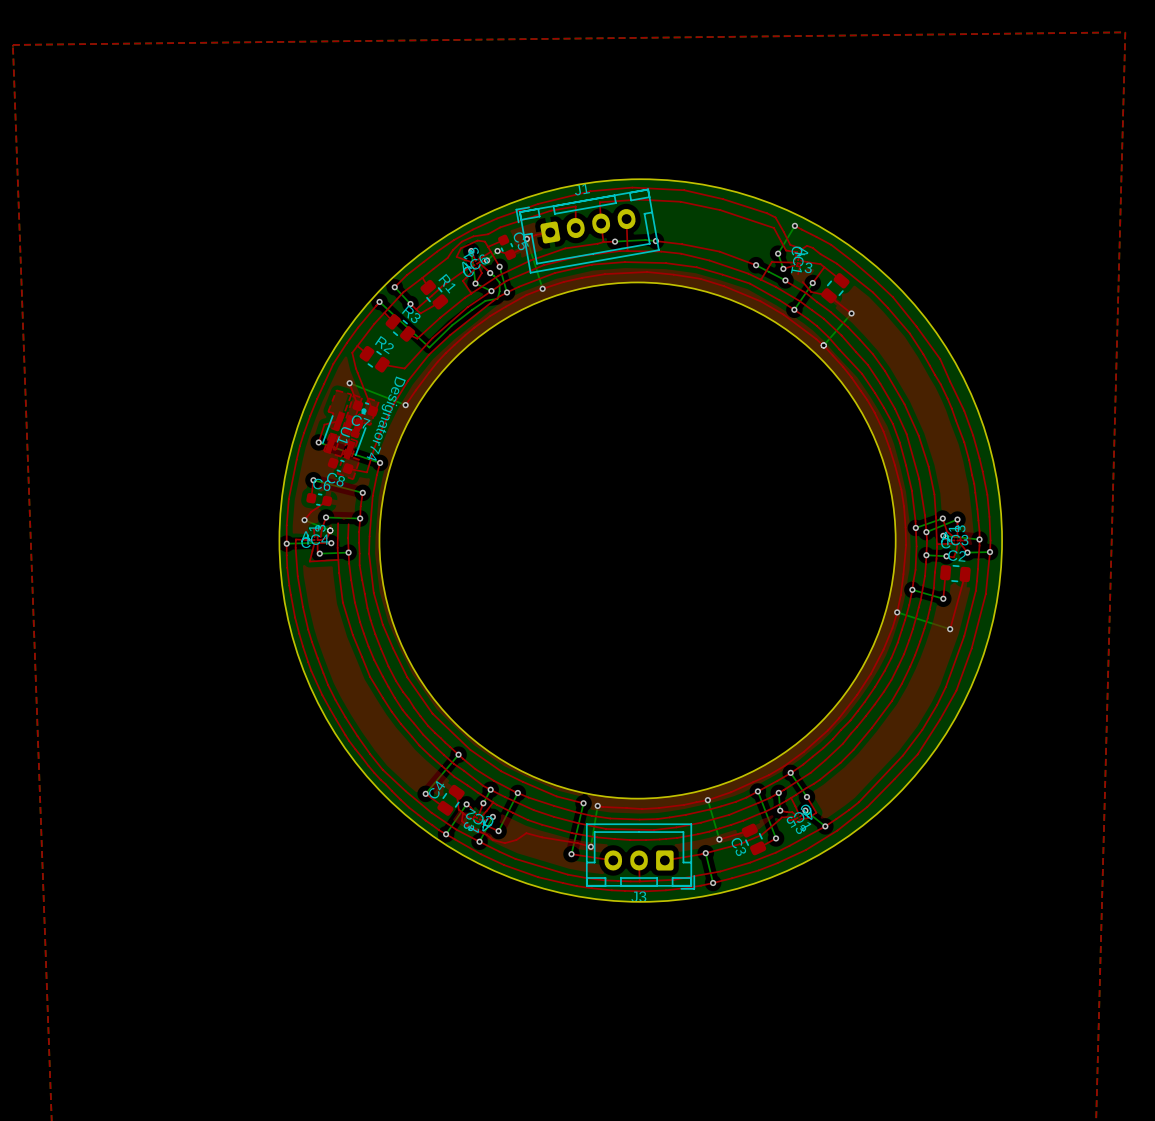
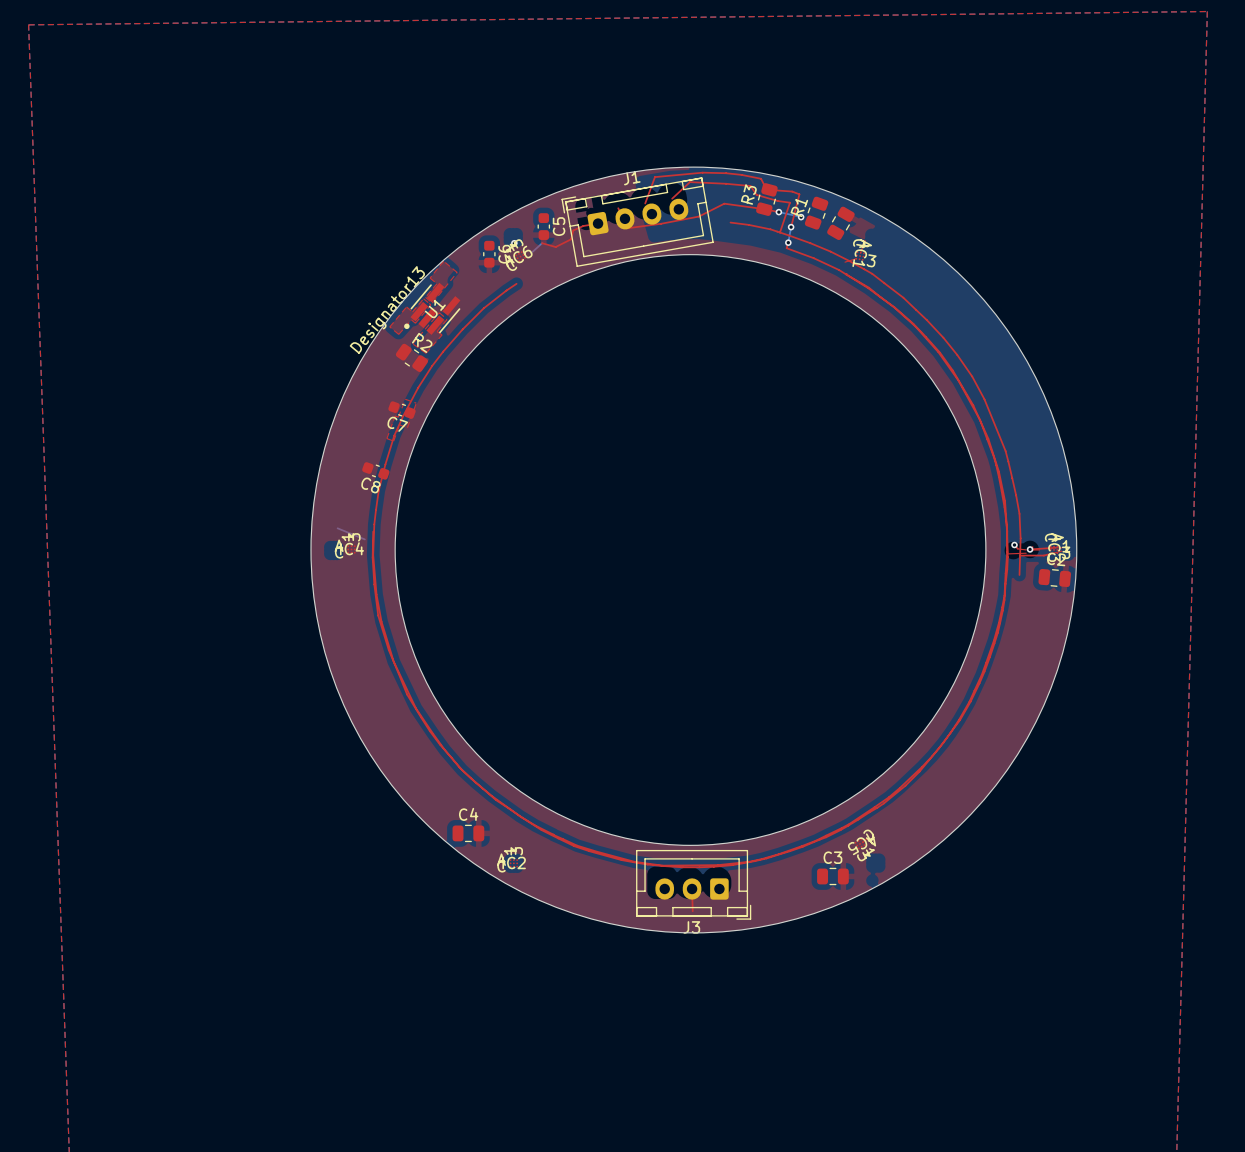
top track: none -> (769, 189) (792, 191) (799, 194) (791, 227)
top track: none -> (767, 192) (761, 178) (726, 173) (702, 172) (654, 177) (645, 203)
top track: none -> (672, 198) (689, 182) (750, 186) (756, 194) (789, 202) (779, 232)
top track: none -> (618, 208) (627, 228) (698, 216) (724, 203) (778, 212)
top track: (626, 219) (627, 251) -> none
bottom track: none -> (778, 212) (801, 217)
via: none -> (778, 212)
top track: (794, 225) (831, 244) (875, 280) (892, 297) (940, 359) (964, 411) (973, 435) (987, 494) (990, 540) (985, 594) (971, 648) (956, 690) (917, 754) (894, 779) (867, 806) (837, 830) (805, 849) (758, 870) (701, 885) (644, 891) (576, 886) (538, 877) (480, 854) (425, 820) (408, 807) (380, 779) (349, 740) (322, 695) (302, 646) (290, 595) (286, 555) (288, 499) (299, 446) (317, 398) (333, 363) (358, 327) (379, 301) -> none
bottom track: (794, 225) (778, 253) (783, 268) -> none
via: (794, 225) -> none
via: none -> (801, 217)
top track: (575, 228) (575, 206) (551, 210) (500, 227) (488, 234) (473, 236) (461, 241) (447, 257) (422, 277) -> none
top track: none -> (730, 222) (770, 229) (810, 243) (849, 261) (872, 273) (903, 297) (943, 337) (972, 376) (984, 399) (1005, 451) (1019, 513) (1019, 575)
part: none -> (840, 223)
bottom track: none -> (791, 227) (788, 242)
via: none -> (791, 227)
bottom track: (526, 238) (542, 288) -> none
via: (526, 238) -> none
top track: (503, 240) (488, 246) -> none
top track: (615, 241) (603, 242) -> none
via: (615, 241) -> none
top track: (655, 241) (719, 251) (756, 265) -> none
bottom track: (655, 241) (615, 241) -> none
via: (655, 241) -> none
top track: (603, 242) (599, 202) (639, 199) (680, 201) (720, 210) (773, 227) (786, 250) (797, 252) (795, 259) -> none
top track: (603, 242) (565, 248) (530, 260) (498, 275) (465, 297) (417, 338) (407, 333) -> none
C5 rotation: 0° (506, 247) -> 25° clockwise (543, 226)
top track: none -> (788, 242) (786, 248) (838, 269) (868, 288) (915, 326) (938, 352) (958, 380) (980, 419) (993, 457) (1004, 507) (1007, 552) (1004, 595) (993, 640) (969, 701) (943, 742) (900, 787) (849, 823) (801, 846) (749, 861) (718, 865) (662, 865) (634, 861) (577, 845) (535, 825) (492, 796) (462, 770) (444, 750) (415, 708) (393, 661) (381, 621) (376, 594) (373, 555) (374, 524) (378, 490) (394, 435) (418, 387) (443, 351) (483, 308) (516, 283)
via: none -> (788, 242)
top track: (471, 251) (475, 261) -> none
bottom track: (471, 251) (475, 283) -> none
top track: (490, 251) (478, 259) -> none
via: (497, 251) -> none
top track: (627, 251) (579, 256) (543, 265) (506, 280) (467, 307) (432, 338) (404, 368) (382, 364) -> none
top track: (627, 251) (681, 253) (709, 260) (748, 273) (800, 301) (823, 318) (841, 335) (867, 364) (880, 383) (906, 434) (919, 479) (924, 515) (927, 540) (926, 563) -> none
via: (778, 253) -> none
top track: (487, 260) (477, 263) -> none
via: (487, 260) -> none
top track: (801, 260) (820, 264) (841, 280) -> none
top track: (472, 262) (456, 256) (460, 248) (477, 240) (484, 241) (499, 266) -> none
top track: (794, 262) (771, 262) (760, 279) -> none
top track: (800, 263) (797, 263) (797, 266) (800, 266) (798, 274) -> none
top track: (481, 264) (490, 273) -> none
top track: (474, 265) (442, 286) (416, 309) -> none
bottom track: (756, 265) (785, 280) -> none
via: (756, 265) -> none
top track: (478, 266) (481, 273) (475, 283) -> none
bottom track: (499, 266) (506, 292) -> none
via: (499, 266) -> none
top zone outline: none -> (443, 261) (457, 272) (432, 303) (425, 297) (436, 283) (430, 278) (443, 261)
top track: (476, 267) (462, 280) (471, 293) -> none
top track: (824, 267) (812, 283) -> none
via: (783, 268) -> none
bottom track: (490, 273) (499, 282) (497, 298) (485, 300) (472, 309) (451, 325) (429, 347) (379, 301) -> none
via: (490, 273) -> none
top track: (422, 277) (403, 292) (374, 323) (352, 352) (355, 368) (372, 411) -> none
top track: (422, 277) (428, 287) -> none
via: (785, 280) -> none
round board edge size: [378, 281, 897, 800] -> [394, 254, 987, 846]
top track: (802, 281) (811, 291) (828, 295) (851, 313) -> none
R1 name position: R1 (447, 283) -> R1 (799, 208)
bottom track: (475, 283) (491, 291) -> none
via: (475, 283) -> none
bottom track: (812, 283) (794, 309) -> none
via: (812, 283) -> none
top track: (394, 287) (437, 251) (472, 229) (538, 203) (590, 191) (632, 187) (684, 190) (723, 199) (775, 217) (790, 244) (802, 248) (806, 245) (812, 247) (836, 263) (873, 292) (887, 307) (909, 333) (947, 398) (969, 459) (974, 483) (979, 531) (975, 590) (964, 635) (945, 686) (922, 729) (902, 755) (858, 802) (825, 826) (776, 852) (720, 871) (673, 879) (630, 881) (587, 878) (567, 874) (515, 858) (456, 829) (431, 812) (382, 769) (357, 736) (335, 699) (323, 673) (308, 629) (297, 576) (295, 539) (314, 540) -> none
bottom track: (394, 287) (410, 304) -> none
via: (394, 287) -> none
via: (542, 288) -> none
part: (835, 288) -> none
via: (491, 291) -> none
via: (506, 292) -> none
R1 rotation: 0° (434, 294) -> 60° clockwise (816, 213)
R1 position: (434, 294) -> (816, 213)
via: (379, 301) -> none
top track: (440, 301) (420, 313) (410, 304) -> none
top zone outline: none -> (423, 298) (430, 304) (415, 323) (411, 319) (398, 334) (389, 326) (406, 306) (412, 311) (423, 298)
via: (410, 304) -> none
via: (794, 309) -> none
top track: (384, 312) (393, 321) -> none
bottom track: (851, 313) (823, 345) -> none
via: (851, 313) -> none
R3 name position: R3 (411, 314) -> R3 (748, 194)
top zone outline: none -> (439, 312) (447, 319) (437, 331) (442, 334) (426, 353) (412, 343) (439, 312)
R3 rotation: 0° (400, 327) -> 65° clockwise (766, 199)
R3 position: (400, 327) -> (766, 199)
top track: (357, 345) (366, 353) -> none
via: (823, 345) -> none
top track: (349, 383) (357, 405) -> none
bottom track: (349, 383) (405, 405) -> none
via: (349, 383) -> none
top zone outline: (336, 390) (328, 411) (333, 413) (328, 427) (337, 430) (351, 394) (336, 390) -> none
top zone outline: (353, 394) (335, 449) (333, 449) (338, 435) (330, 433) (323, 451) (341, 456) (362, 397) (353, 394) -> none
top track: (405, 405) (437, 361) (454, 344) (490, 316) (526, 295) (563, 281) (582, 277) (605, 274) (647, 272) (700, 278) (724, 286) (760, 301) (783, 314) (823, 345) (851, 377) (874, 412) (889, 448) (901, 489) (906, 545) (900, 595) (892, 628) (870, 673) (857, 694) (827, 730) (803, 751) (769, 774) (730, 792) (707, 800) (659, 808) (642, 809) (597, 805) -> none
via: (405, 405) -> none
U1 footprint: [322, 408, 367, 460] -> [404, 282, 461, 335]
top track: (339, 421) (324, 424) (318, 442) -> none
top zone outline: (349, 438) (357, 441) (351, 457) (359, 459) (353, 479) (337, 473) (349, 438) -> none
bottom track: (318, 442) (380, 462) -> none
via: (318, 442) -> none
top track: (380, 462) (372, 495) (369, 536) (369, 553) (373, 592) (382, 624) (407, 677) (432, 713) (470, 749) (501, 771) (522, 781) (556, 796) (583, 803) -> none
via: (380, 462) -> none
top track: (348, 468) (366, 472) (383, 425) (407, 381) (428, 354) (450, 334) (500, 296) (554, 273) (591, 264) (624, 262) (665, 263) (696, 267) (749, 283) (807, 318) (828, 337) (862, 373) (875, 393) (892, 424) (899, 442) (911, 490) (916, 546) (912, 589) (897, 642) (875, 686) (850, 720) (823, 748) (803, 764) (746, 797) (709, 809) (657, 819) (610, 818) (591, 815) (528, 797) (493, 780) (475, 769) (445, 742) (428, 726) (414, 707) (388, 666) (367, 608) (359, 565) (359, 532) (362, 492) -> none
top track: (313, 480) (311, 498) -> none
bottom track: (313, 480) (362, 492) -> none
via: (313, 480) -> none
via: (362, 492) -> none
C6 rotation: 0° (319, 499) -> 80° clockwise (489, 254)
C6 position: (319, 499) -> (489, 254)
top track: (327, 501) (311, 511) (304, 520) -> none
top track: (326, 517) (321, 529) -> none
bottom track: (326, 517) (360, 518) -> none
via: (326, 517) -> none
via: (360, 518) -> none
top track: (942, 518) (947, 531) (954, 537) -> none
bottom track: (942, 518) (915, 527) -> none
via: (942, 518) -> none
top track: (957, 519) (957, 537) -> none
bottom track: (957, 519) (926, 532) -> none
via: (957, 519) -> none
via: (304, 520) -> none
top track: (348, 524) (351, 580) (354, 602) (363, 633) (374, 660) (394, 697) (423, 734) (454, 763) (483, 785) (533, 810) (606, 828) (653, 830) (701, 822) (729, 814) (769, 798) (810, 772) (843, 743) (874, 704) (891, 680) (904, 654) (912, 629) (920, 599) (926, 562) -> none
via: (915, 527) -> none
top track: (321, 529) (313, 529) (314, 536) -> none
top track: (321, 529) (320, 536) -> none
top track: (330, 530) (327, 537) (317, 540) (317, 536) -> none
via: (330, 530) -> none
via: (926, 532) -> none
bottom track: (943, 535) (979, 539) -> none
top track: none -> (1061, 547) (1030, 549)
via: (979, 539) -> none
IC3 rotation: 0° (957, 540) -> 90° clockwise (1054, 549)
IC3 position: (957, 540) -> (1054, 549)
via: none -> (1030, 549)
top track: none -> (1061, 551) (1043, 555) (1020, 555)
via: (286, 543) -> none
top track: (314, 543) (309, 561) (338, 559) -> none
top track: (317, 543) (317, 552) (319, 553) -> none
top track: (320, 543) (331, 543) -> none
bottom track: (331, 543) (286, 543) -> none
via: (331, 543) -> none
top track: (957, 543) (953, 557) (946, 556) -> none
top track: (960, 543) (967, 552) -> none
bottom track: (348, 552) (319, 553) -> none
via: (348, 552) -> none
via: (967, 552) -> none
bottom track: (990, 552) (967, 552) -> none
via: (990, 552) -> none
via: (319, 553) -> none
bottom track: (926, 555) (946, 556) -> none
via: (926, 555) -> none
via: (946, 556) -> none
top track: (945, 572) (943, 598) -> none
C2 position: (955, 573) -> (1054, 577)
top track: (965, 574) (950, 629) -> none
bottom track: (912, 589) (943, 598) -> none
via: (912, 589) -> none
via: (943, 598) -> none
bottom track: (897, 612) (950, 629) -> none
via: (897, 612) -> none
via: (950, 629) -> none
bottom track: (458, 754) (425, 793) -> none
via: (458, 754) -> none
bottom track: (790, 772) (806, 797) -> none
via: (790, 772) -> none
bottom track: (490, 789) (483, 803) -> none
via: (490, 789) -> none
bottom track: (757, 791) (776, 838) -> none
via: (757, 791) -> none
top track: (456, 792) (458, 809) (472, 819) (474, 816) (477, 817) -> none
bottom track: (778, 792) (780, 810) -> none
via: (778, 792) -> none
top track: (425, 793) (445, 808) -> none
via: (425, 793) -> none
bottom track: (517, 793) (498, 831) -> none
via: (517, 793) -> none
top track: (791, 797) (798, 813) -> none
top track: (806, 797) (816, 812) (796, 822) -> none
via: (806, 797) -> none
C4 rotation: 0° (451, 800) -> 55° clockwise (468, 833)
C4 position: (451, 800) -> (468, 833)
bottom track: (707, 800) (719, 839) -> none
via: (707, 800) -> none
top track: (493, 802) (481, 816) -> none
via: (483, 803) -> none
bottom track: (583, 803) (571, 854) -> none
via: (583, 803) -> none
top track: (466, 804) (476, 813) -> none
bottom track: (466, 804) (446, 834) -> none
via: (466, 804) -> none
top track: (481, 805) (483, 803) (478, 815) -> none
bottom track: (597, 805) (590, 846) -> none
via: (597, 805) -> none
top track: (780, 810) (792, 812) (795, 815) -> none
via: (780, 810) -> none
bottom track: (805, 810) (825, 826) -> none
via: (805, 810) -> none
top track: (463, 813) (461, 821) (492, 840) (504, 843) (516, 840) (526, 833) (590, 846) -> none
top track: (492, 816) (485, 820) (479, 819) -> none
bottom track: (492, 816) (479, 841) -> none
via: (492, 816) -> none
top track: (793, 816) (781, 817) (761, 834) (739, 844) (702, 854) (664, 860) -> none
IC2 rotation: 0° (477, 817) -> 150° clockwise (513, 863)
IC2 position: (477, 817) -> (513, 863)
top track: (797, 817) (788, 820) -> none
top track: (475, 820) (498, 831) -> none
via: (825, 826) -> none
top track: (749, 830) (719, 839) -> none
via: (498, 831) -> none
via: (446, 834) -> none
top track: (776, 838) (758, 848) -> none
via: (776, 838) -> none
via: (719, 839) -> none
C3 rotation: 0° (753, 839) -> 65° counterclockwise (832, 876)
C3 position: (753, 839) -> (832, 876)
via: (479, 841) -> none
via: (590, 846) -> none
C3 name position: C3 (738, 846) -> C3 (832, 857)
bottom track: (705, 853) (713, 883) -> none
via: (705, 853) -> none
top track: (571, 854) (613, 860) -> none
via: (571, 854) -> none
via: (713, 883) -> none

